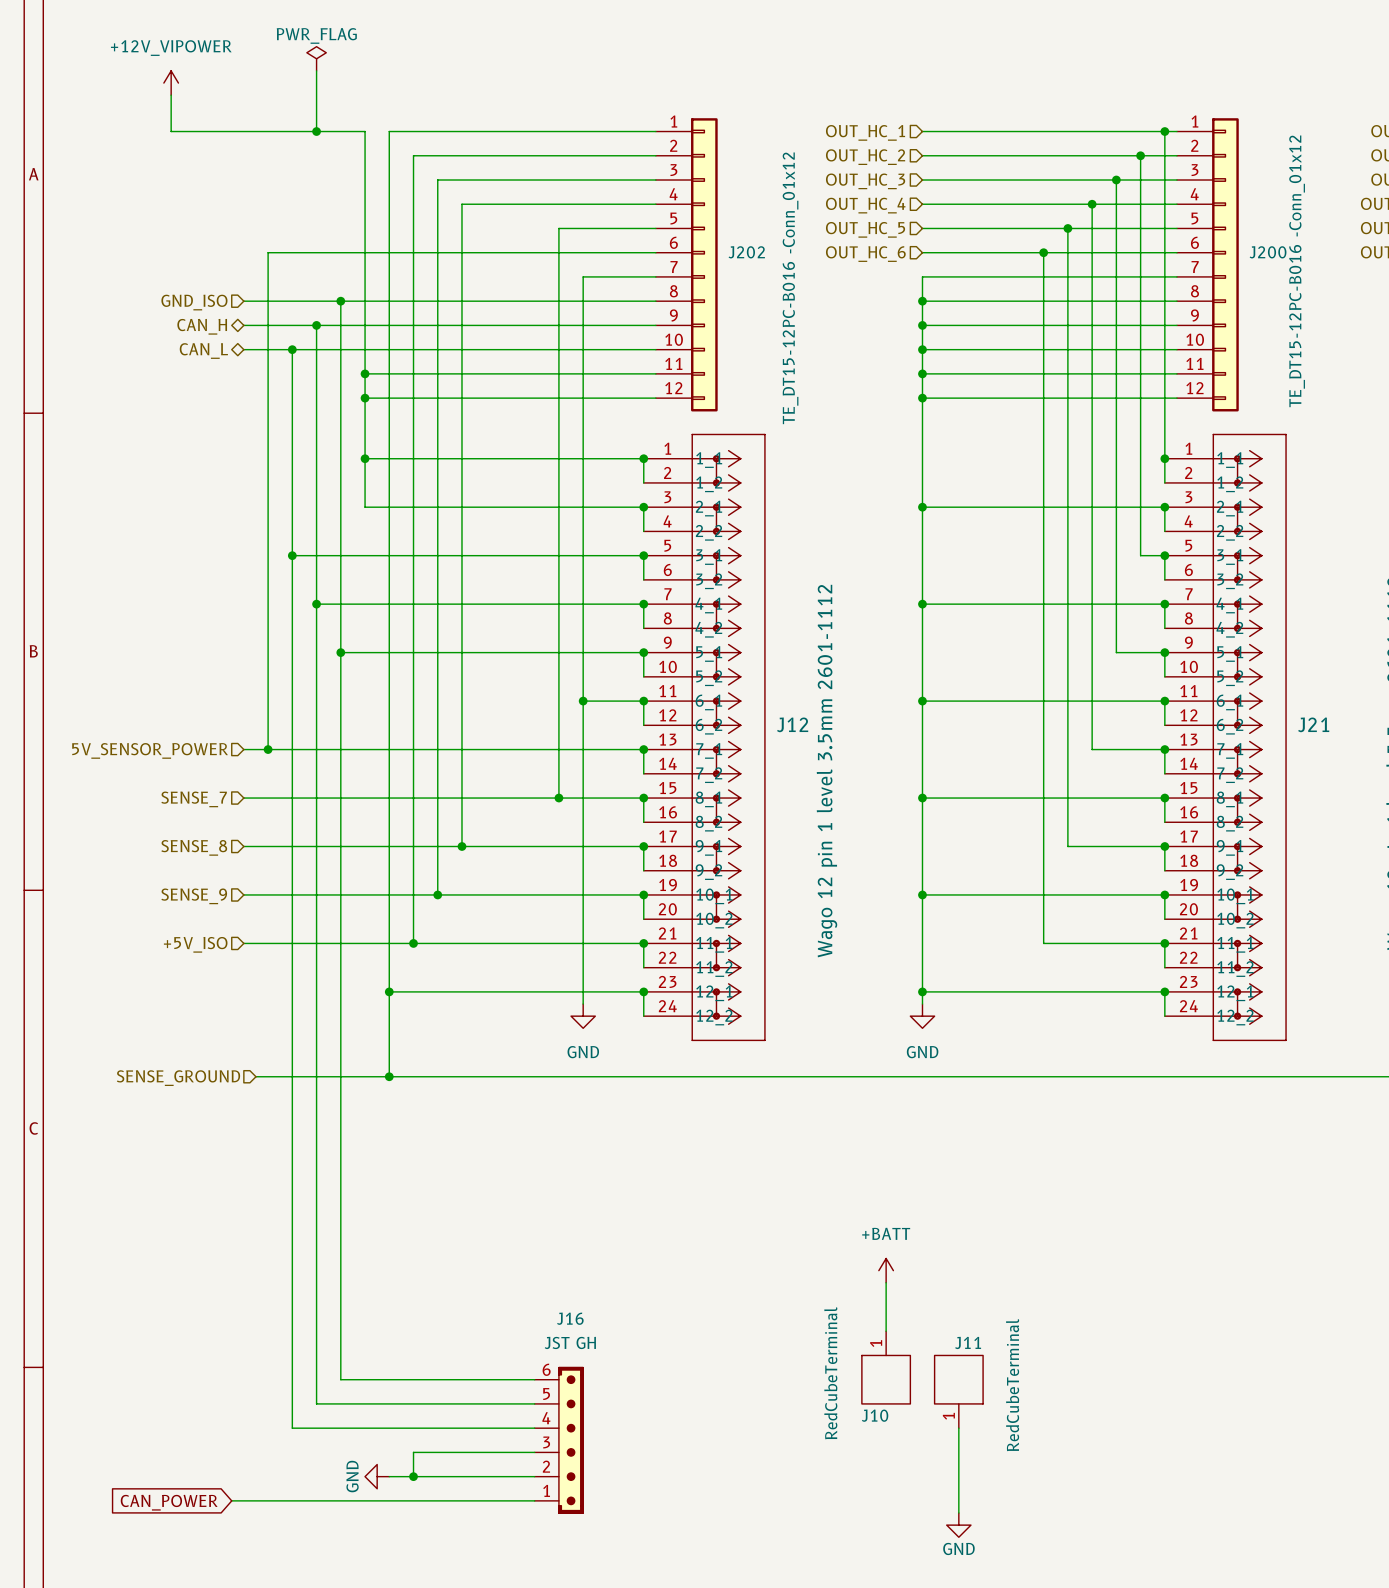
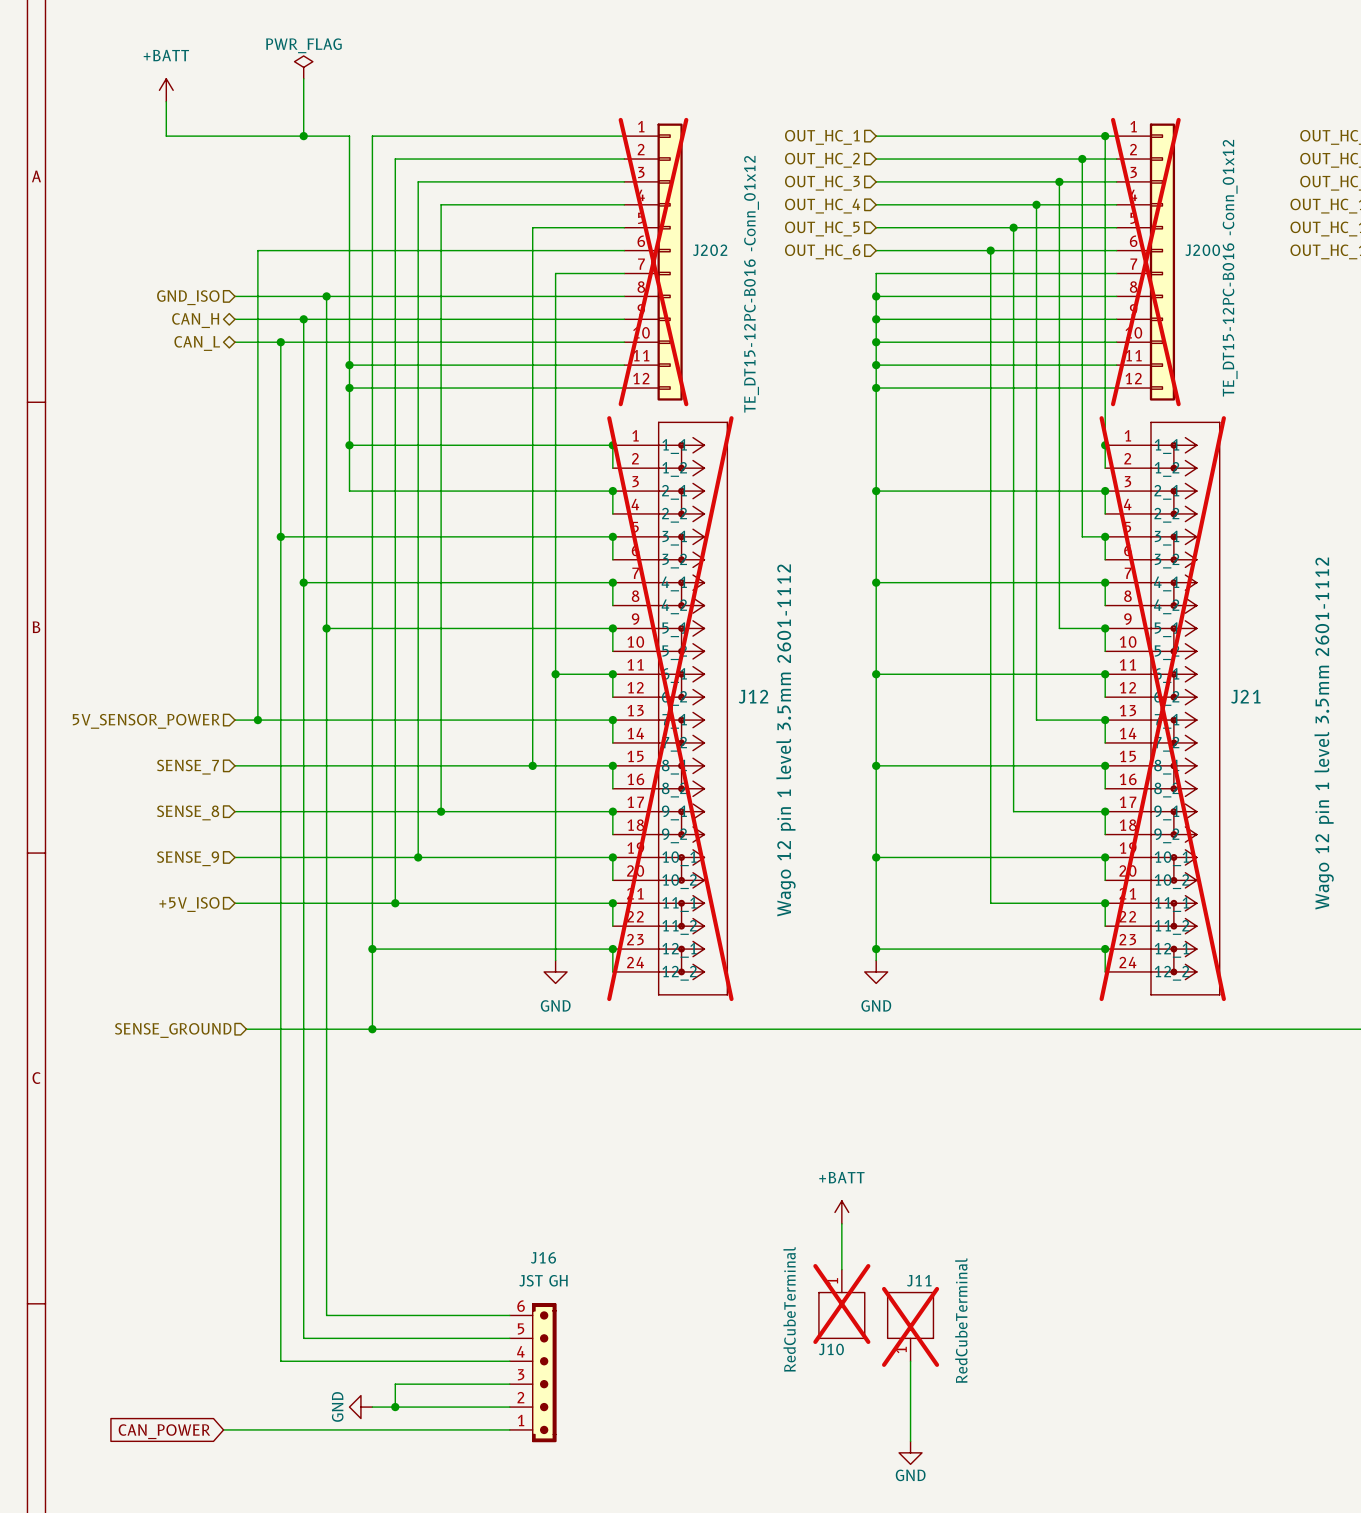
power symbol: +12V_VIPOWER (171, 83) -> +BATT (166, 90)
J202 do-not-place cross: none -> (653, 262)
J200 do-not-place cross: none -> (1145, 262)
J12 do-not-place cross: none -> (670, 708)
J21 do-not-place cross: none -> (1162, 708)
J10 do-not-place cross: none -> (841, 1304)
J11 do-not-place cross: none -> (910, 1326)

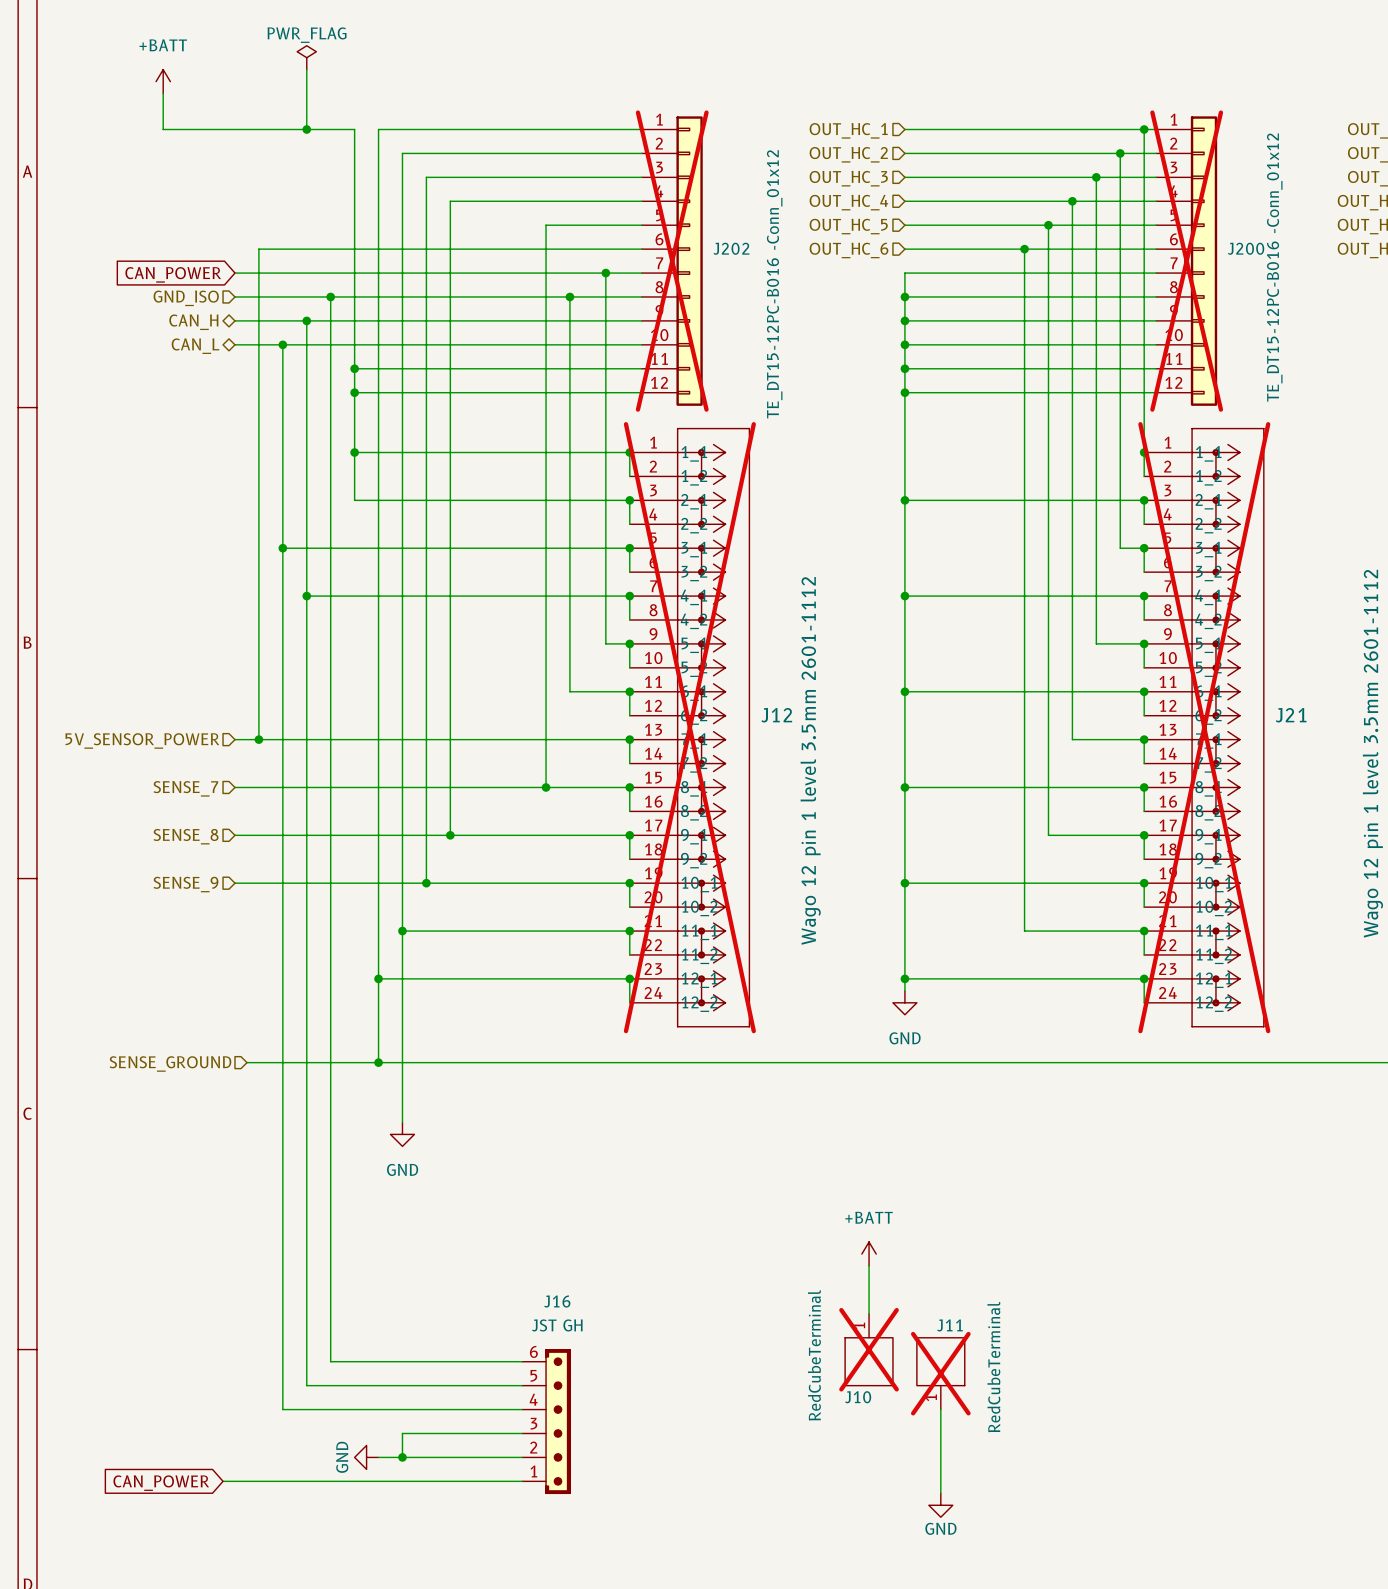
wire: (555, 273) (555, 296) -> (569, 273) (234, 273)
junction: none -> (605, 273)
global label: none -> CAN_POWER (173, 274)
junction: none -> (569, 296)
wire: (326, 628) (589, 628) -> (605, 273) (605, 643)
junction: (326, 628) -> none
wire: (555, 674) (555, 960) -> none
junction: (555, 674) -> none
wire: (235, 903) (395, 903) -> (402, 1122) (402, 931)
hierarchical label: +5V_ISO (189, 904) -> none
power symbol position: GND (555, 971) -> GND (402, 1134)

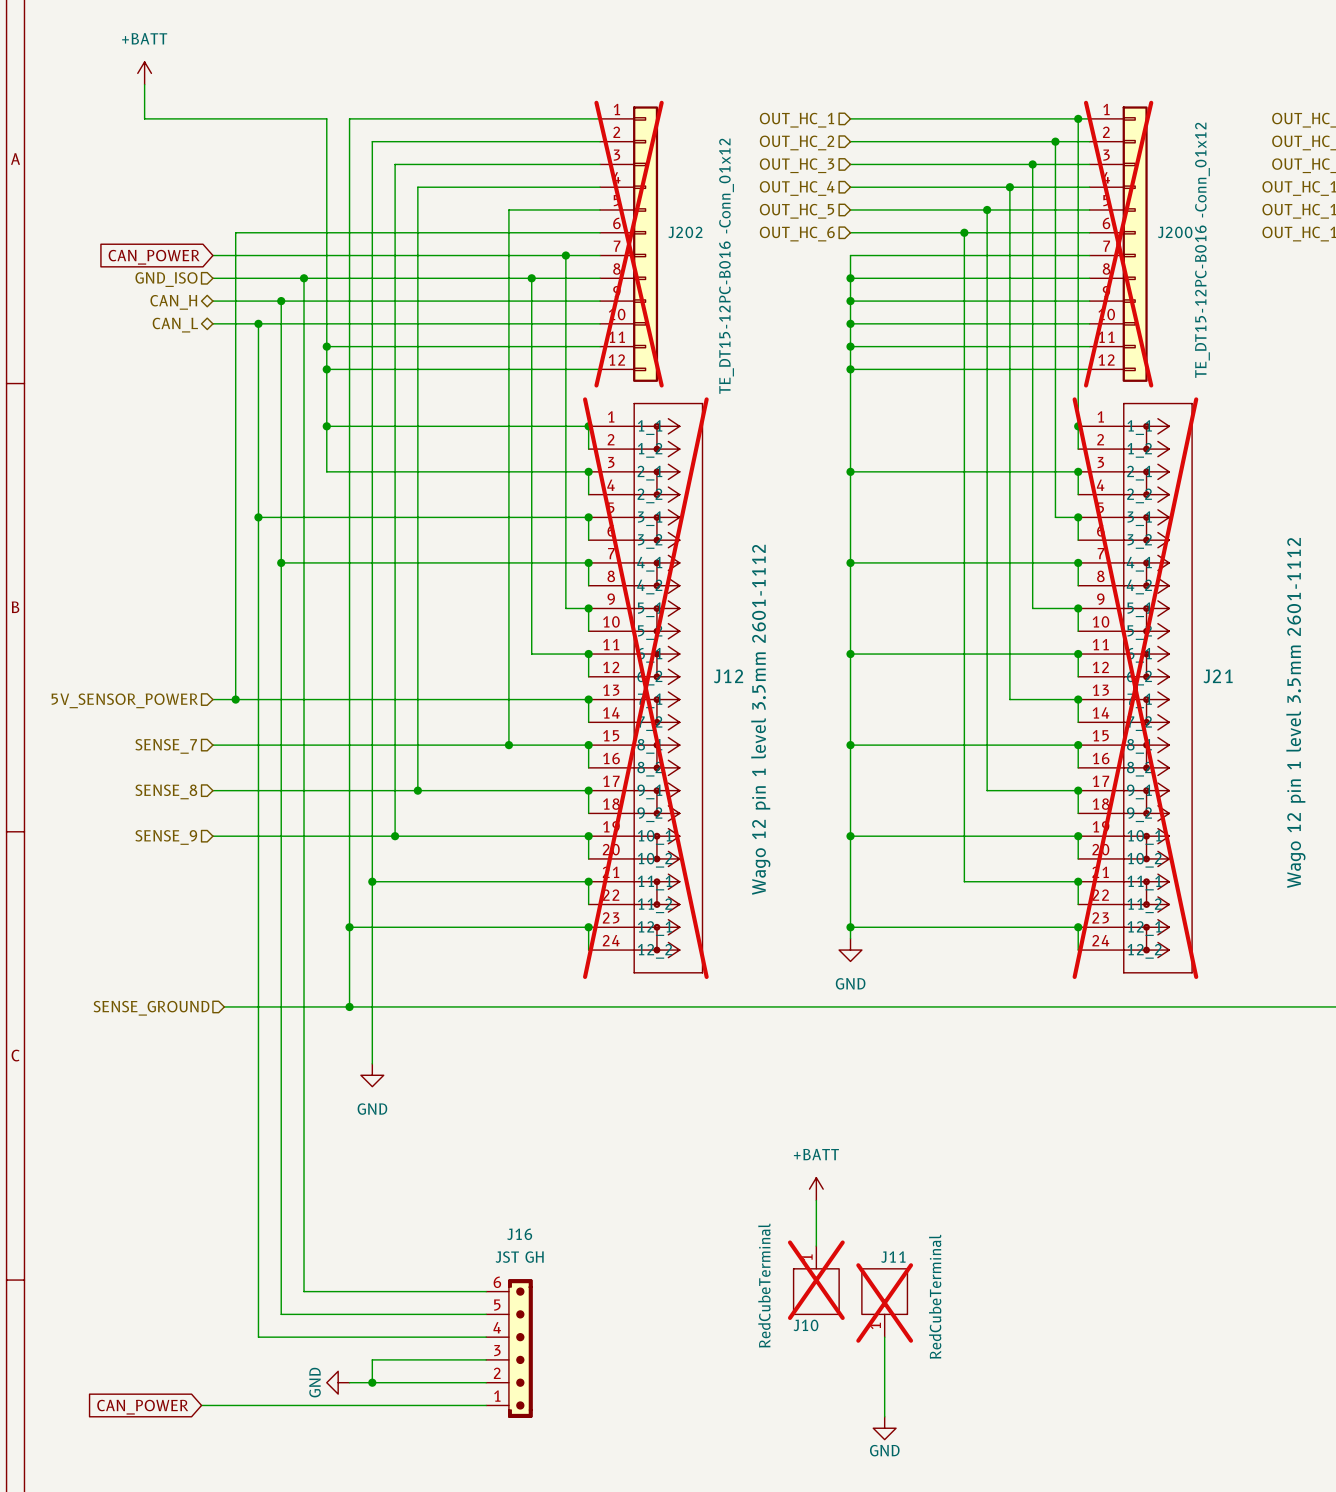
power symbol: PWR_FLAG (306, 57) -> none
wire: (306, 69) (306, 129) -> none
junction: (306, 129) -> none

